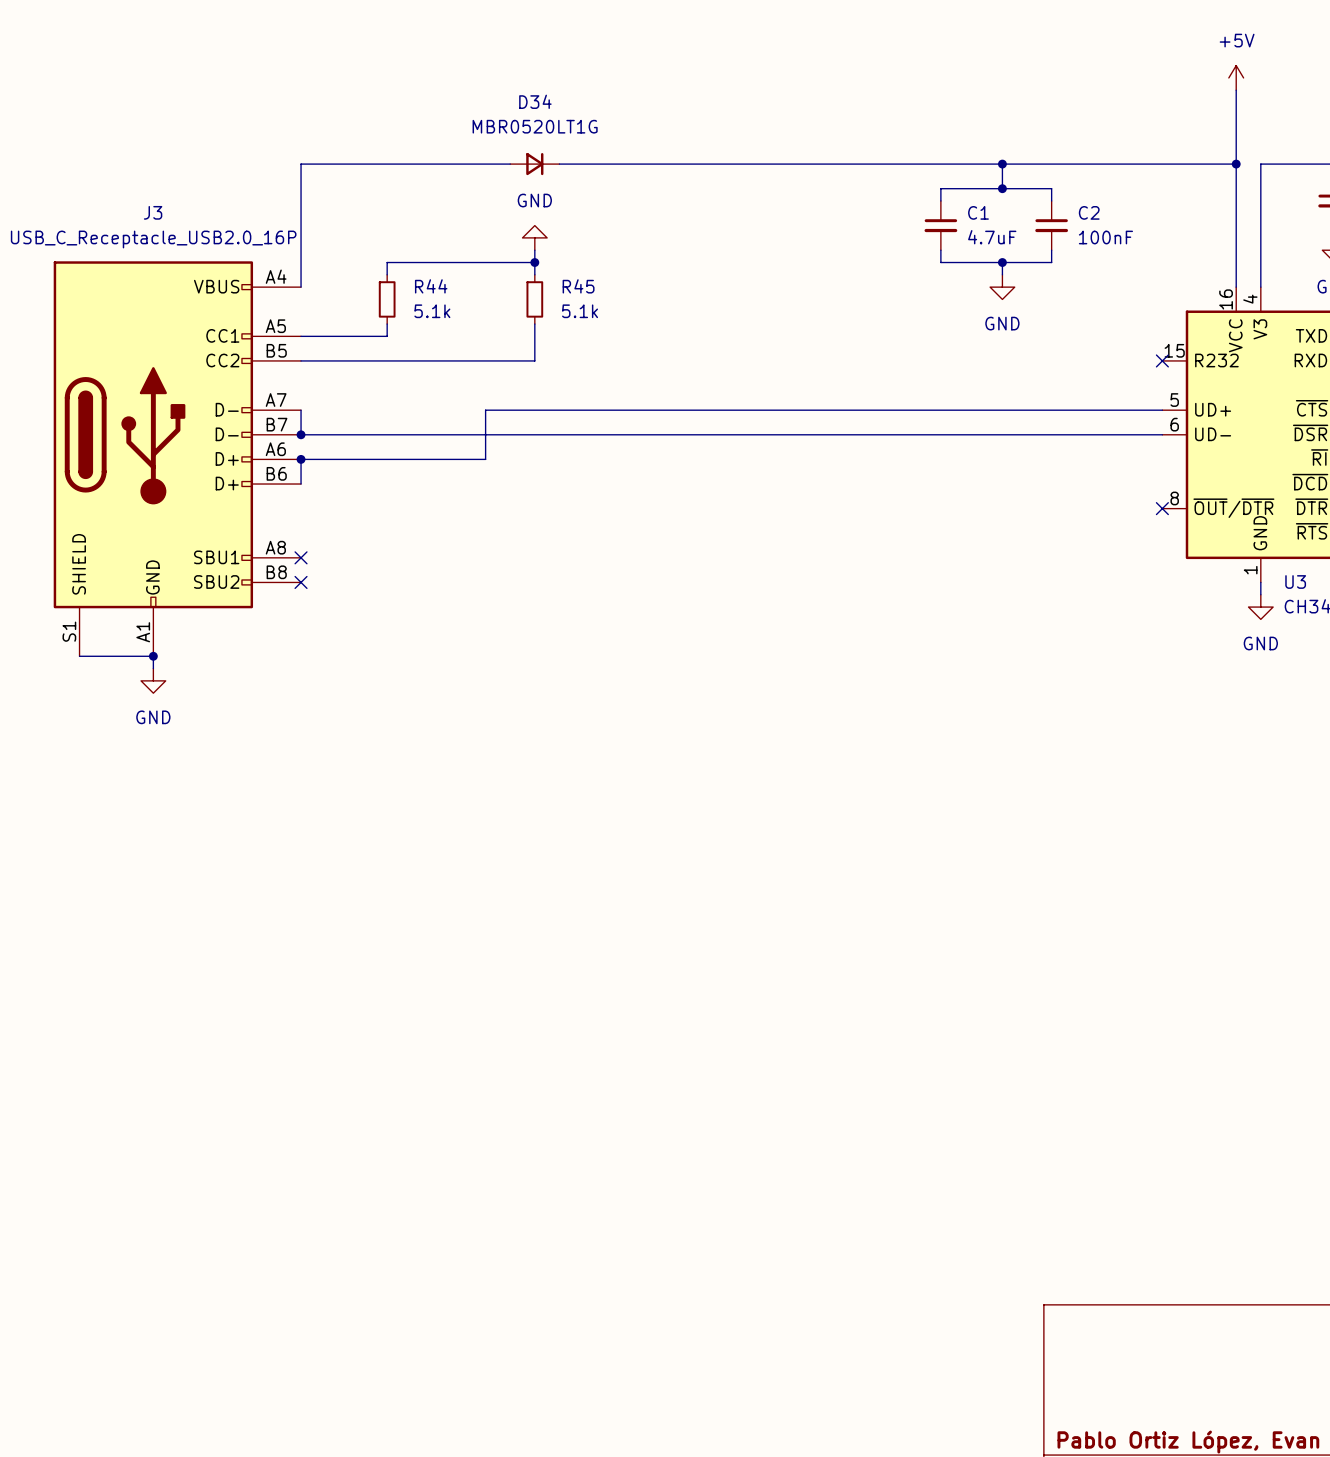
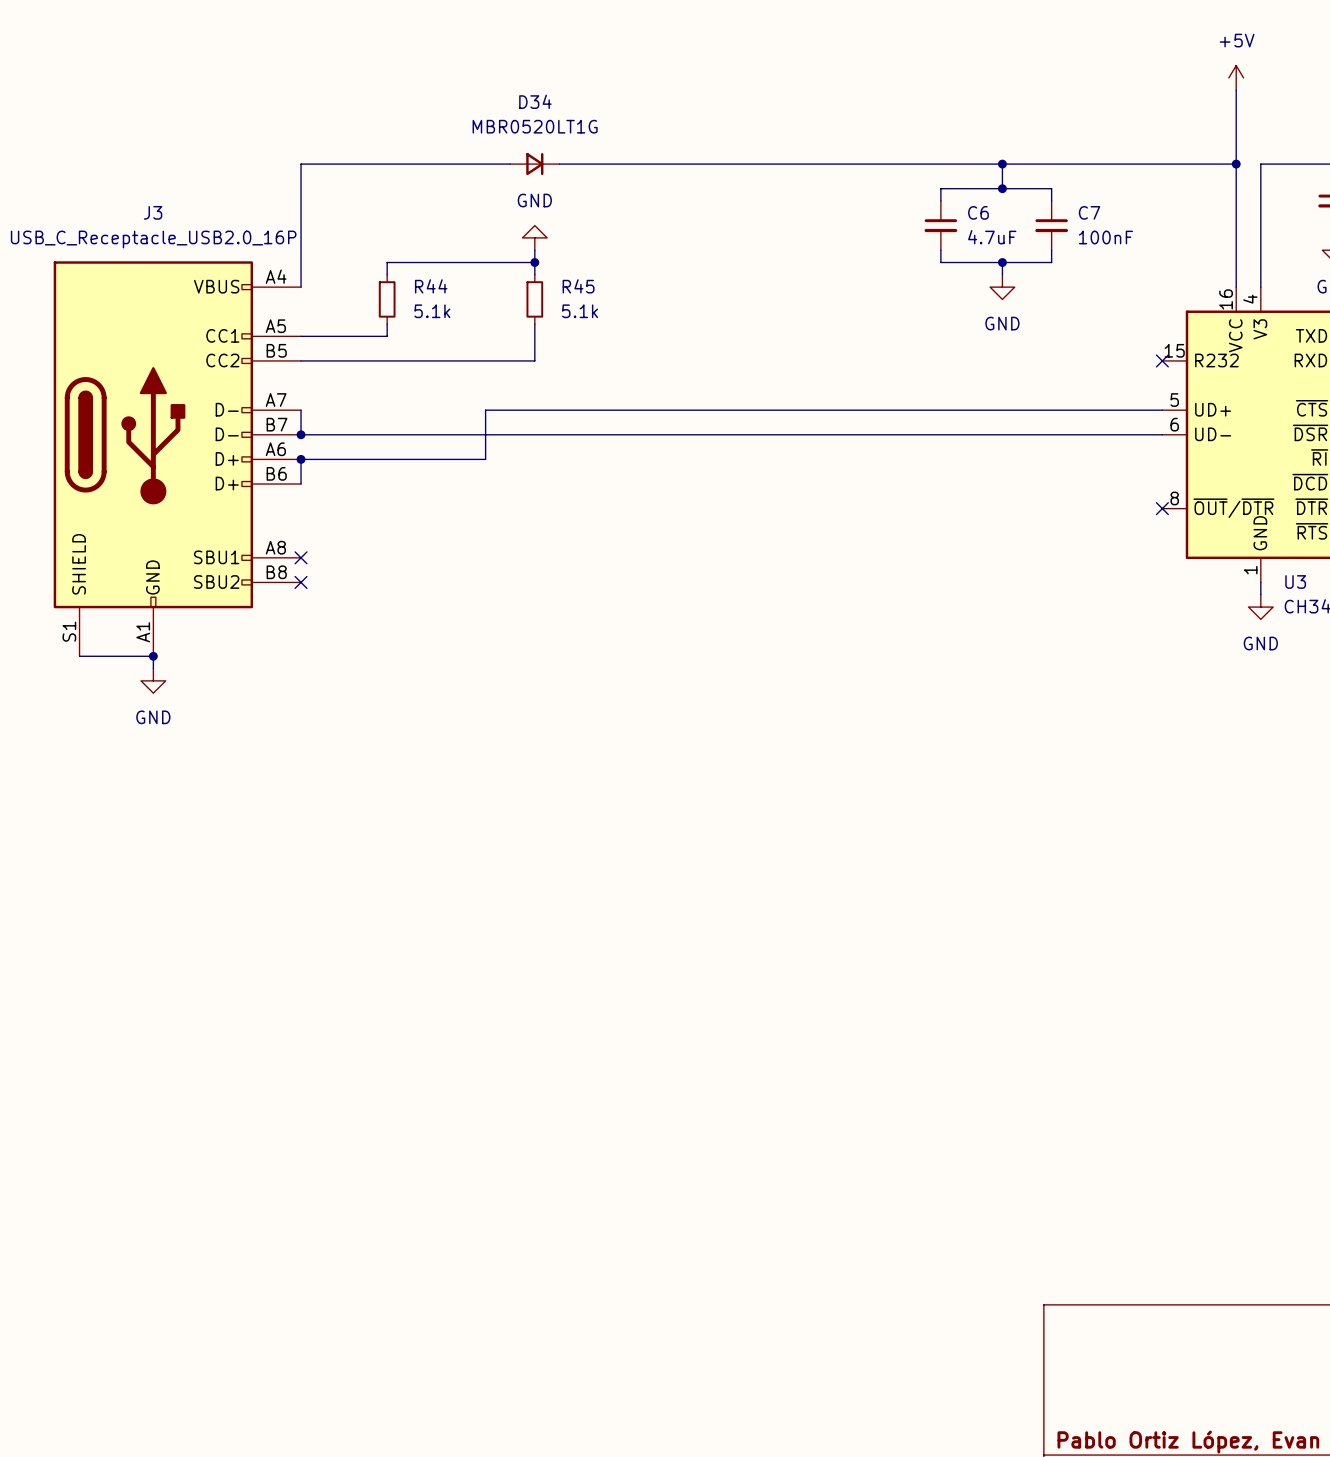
C1 name: C1 (978, 212) -> C6 (978, 212)
C2 name: C2 (1089, 212) -> C7 (1089, 212)

